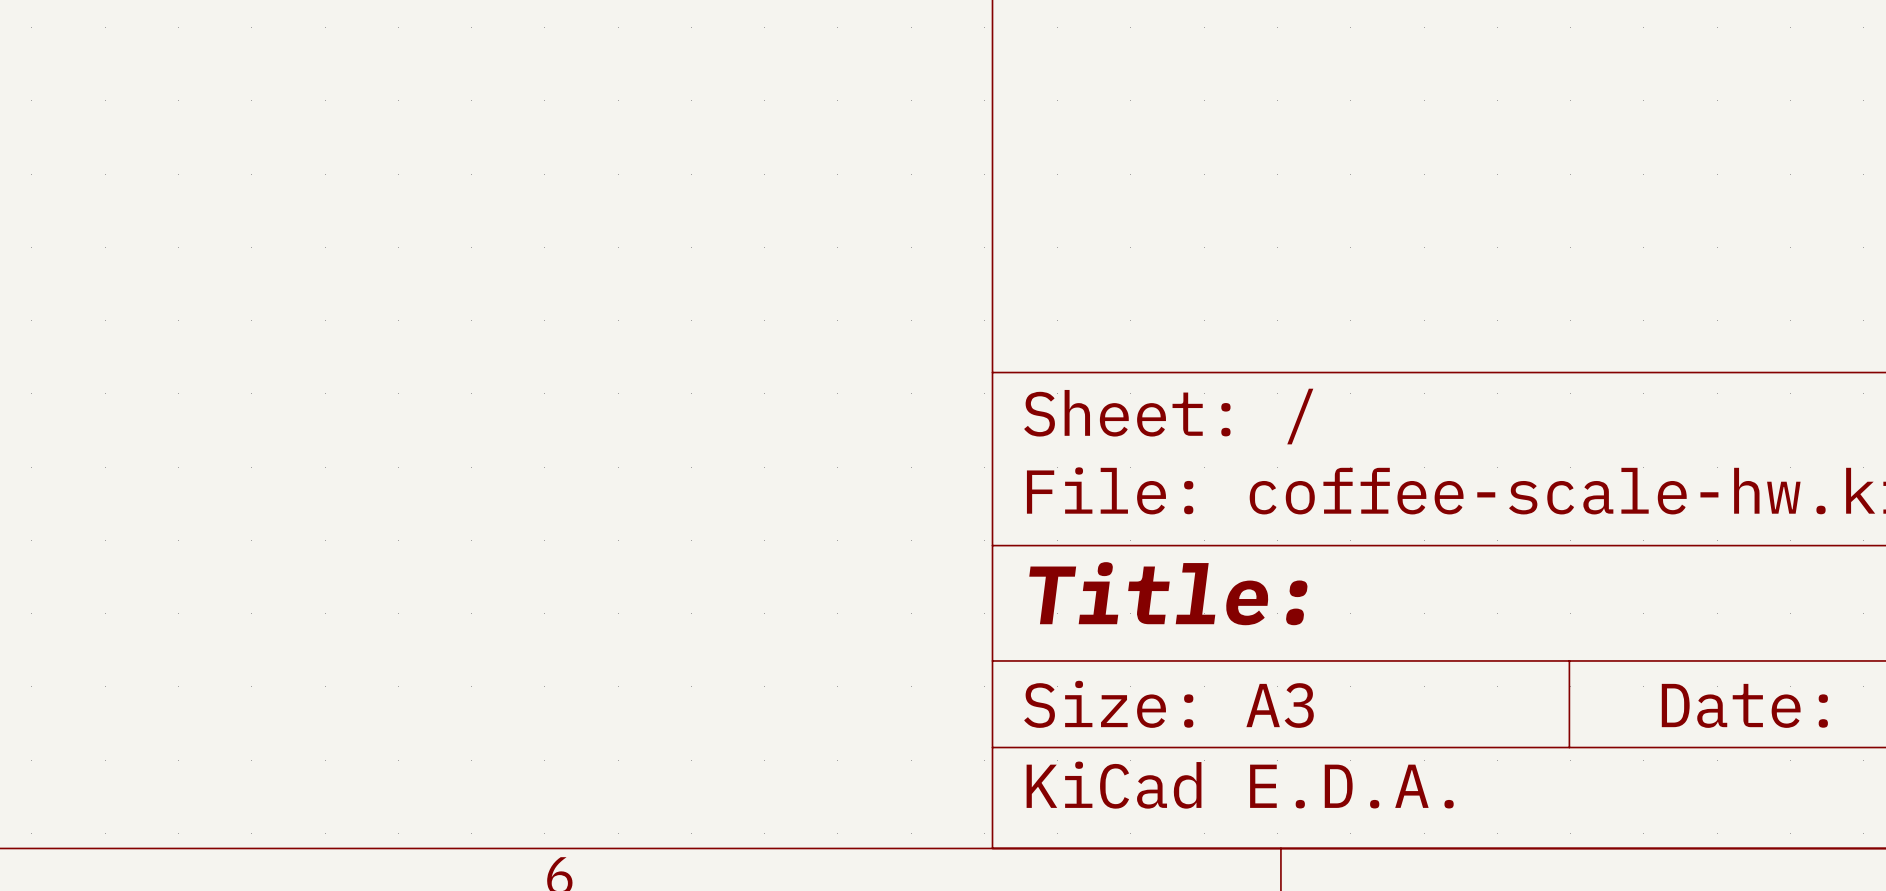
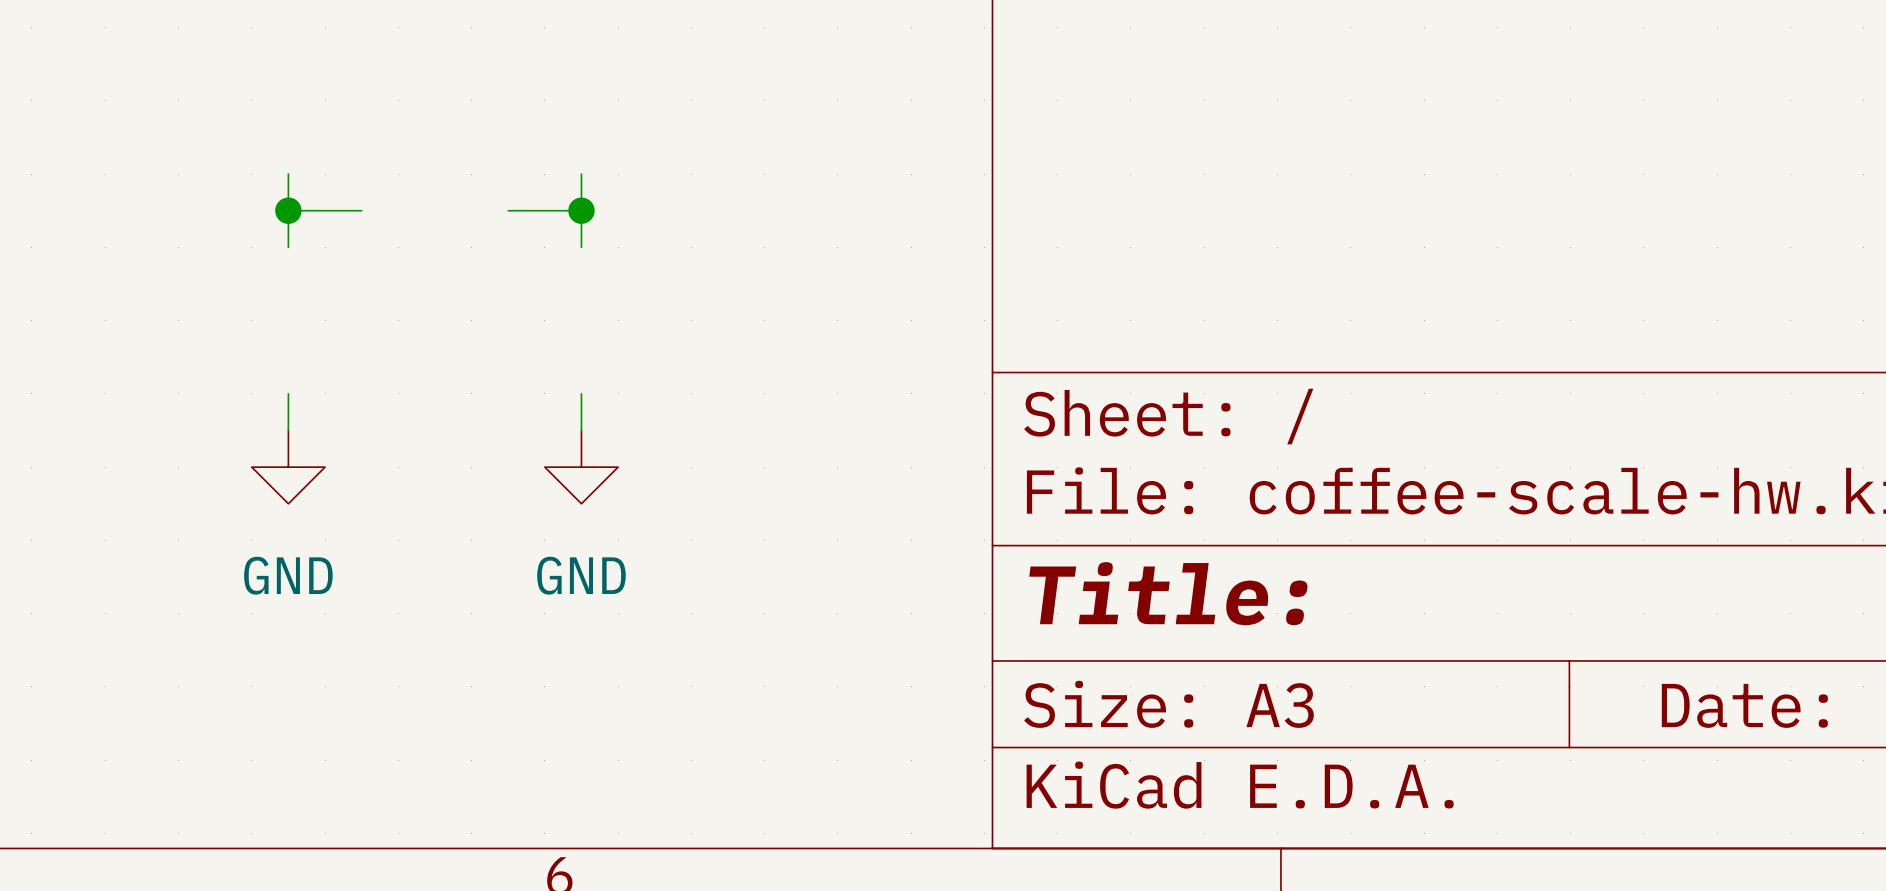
wire: none -> (288, 174) (288, 247)
wire: none -> (581, 174) (581, 247)
wire: none -> (288, 210) (361, 210)
junction: none -> (288, 210)
wire: none -> (508, 210) (581, 210)
junction: none -> (581, 210)
wire: none -> (288, 393) (288, 430)
wire: none -> (581, 393) (581, 430)
power symbol: none -> GND (288, 467)
power symbol: none -> GND (581, 467)

